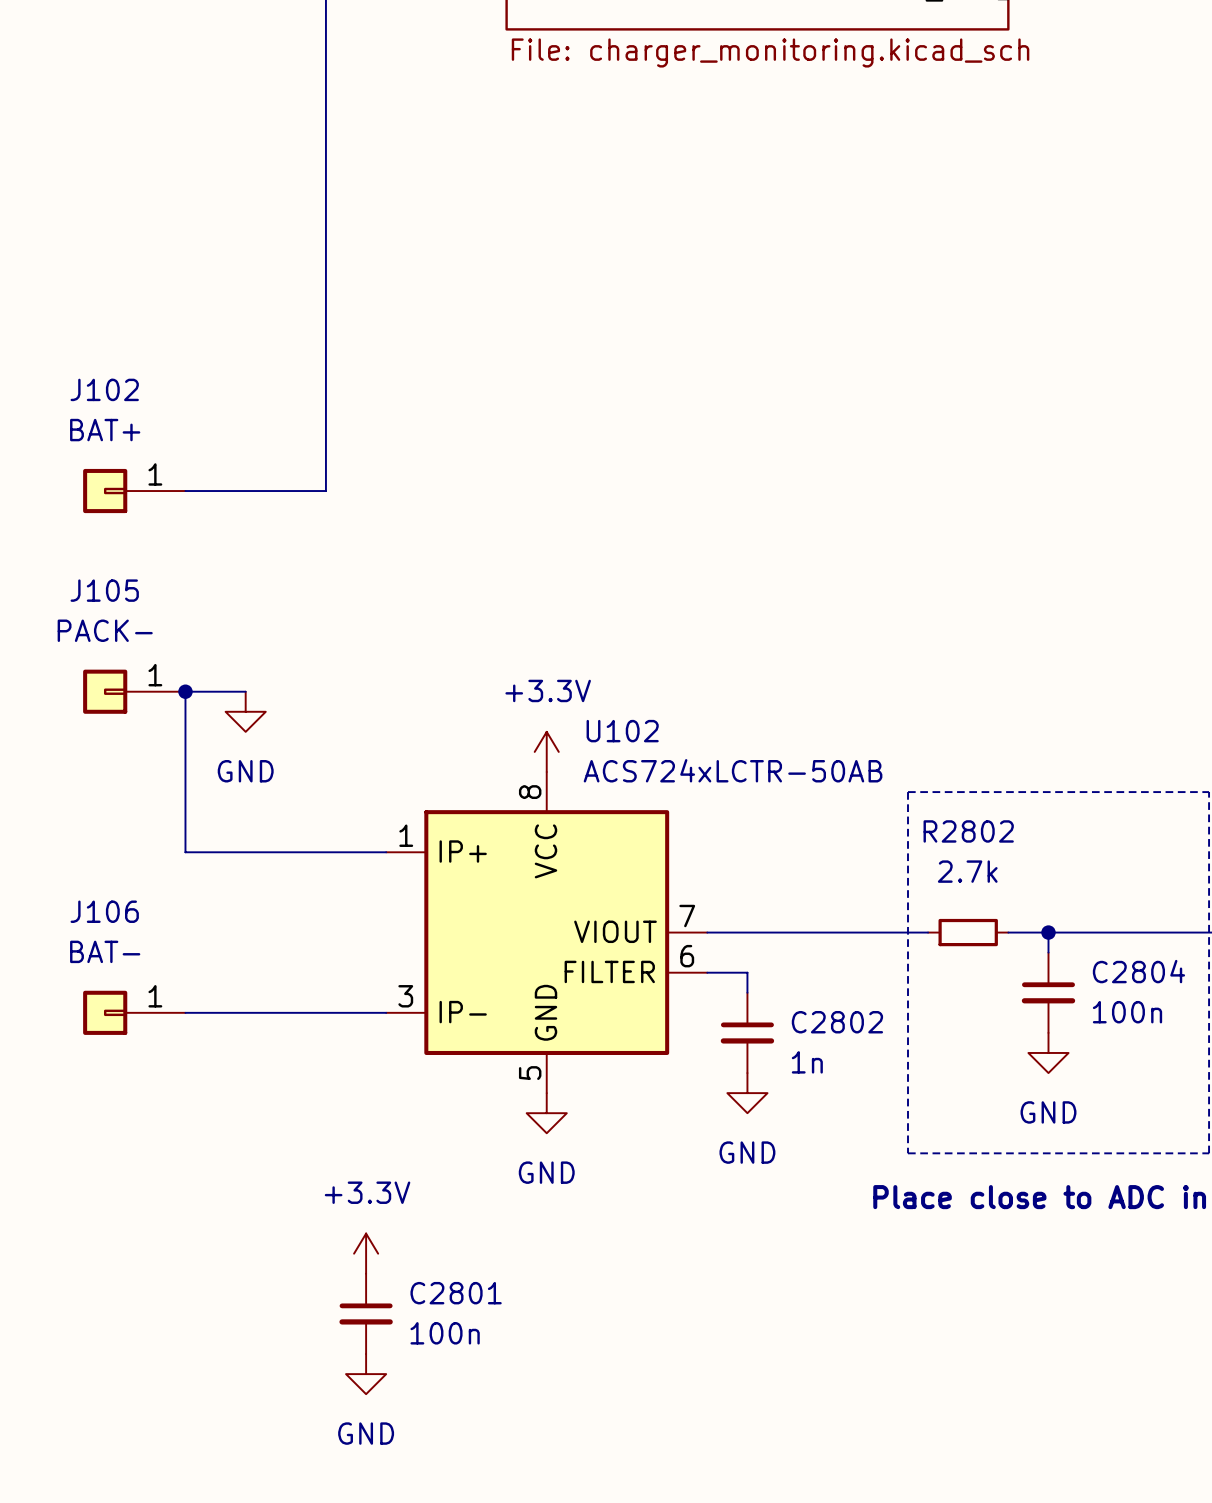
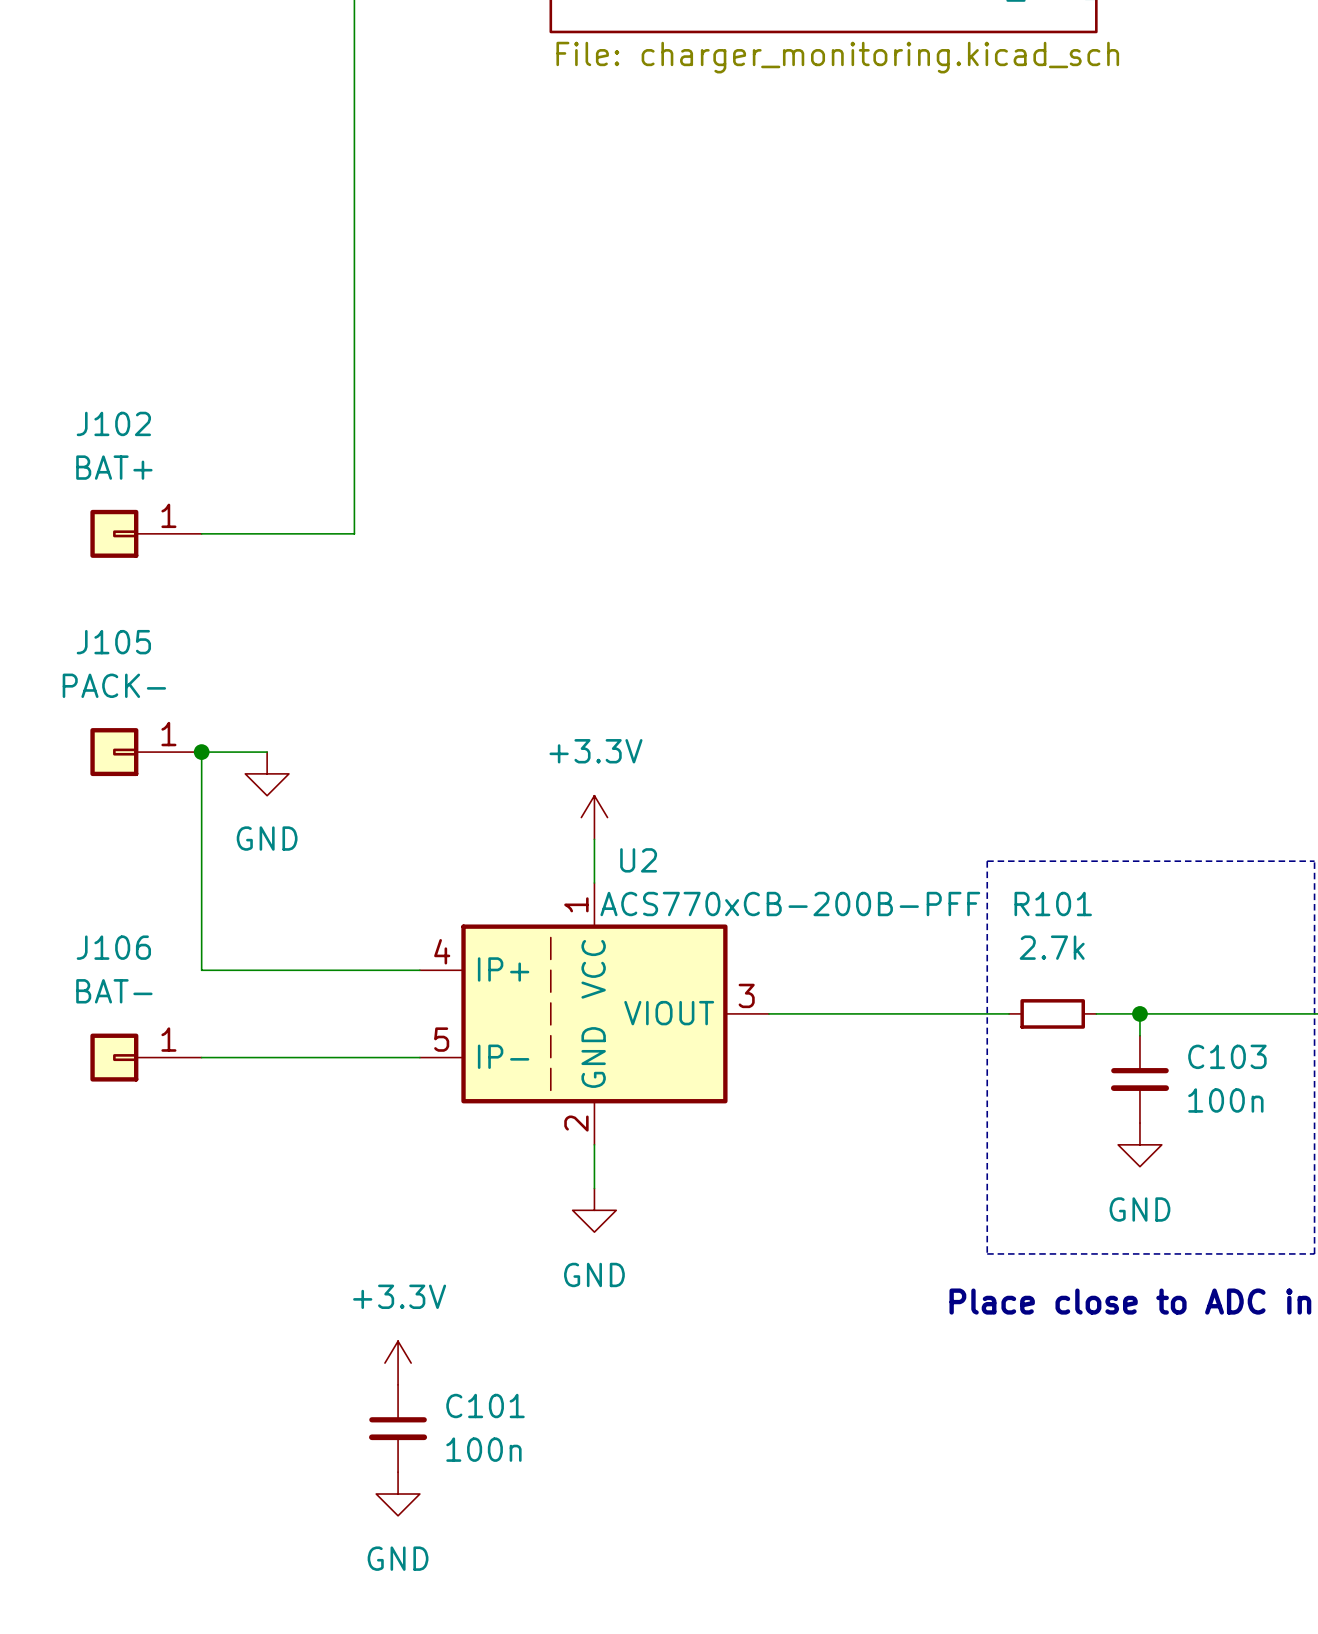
R2802 name: R2802 (968, 831) -> R101 (1053, 904)
wire: (185, 852) (386, 852) -> (201, 926) (201, 970) (419, 970)
U102: ACS724xLCTR-50AB (546, 932) -> none
U2: none -> ACS770xCB-200B-PFF (594, 1013)
C2804 name: C2804 (1138, 971) -> C103 (1227, 1056)
wire: (707, 972) (747, 972) (747, 992) -> none
J106 position: (134, 1012) -> (146, 1057)
wire: (185, 1012) (386, 1012) -> (201, 1057) (419, 1057)
C2802: 1n (747, 1032) -> none
power symbol: GND (747, 1093) -> none
C2801 name: C2801 (456, 1293) -> C101 (485, 1406)

